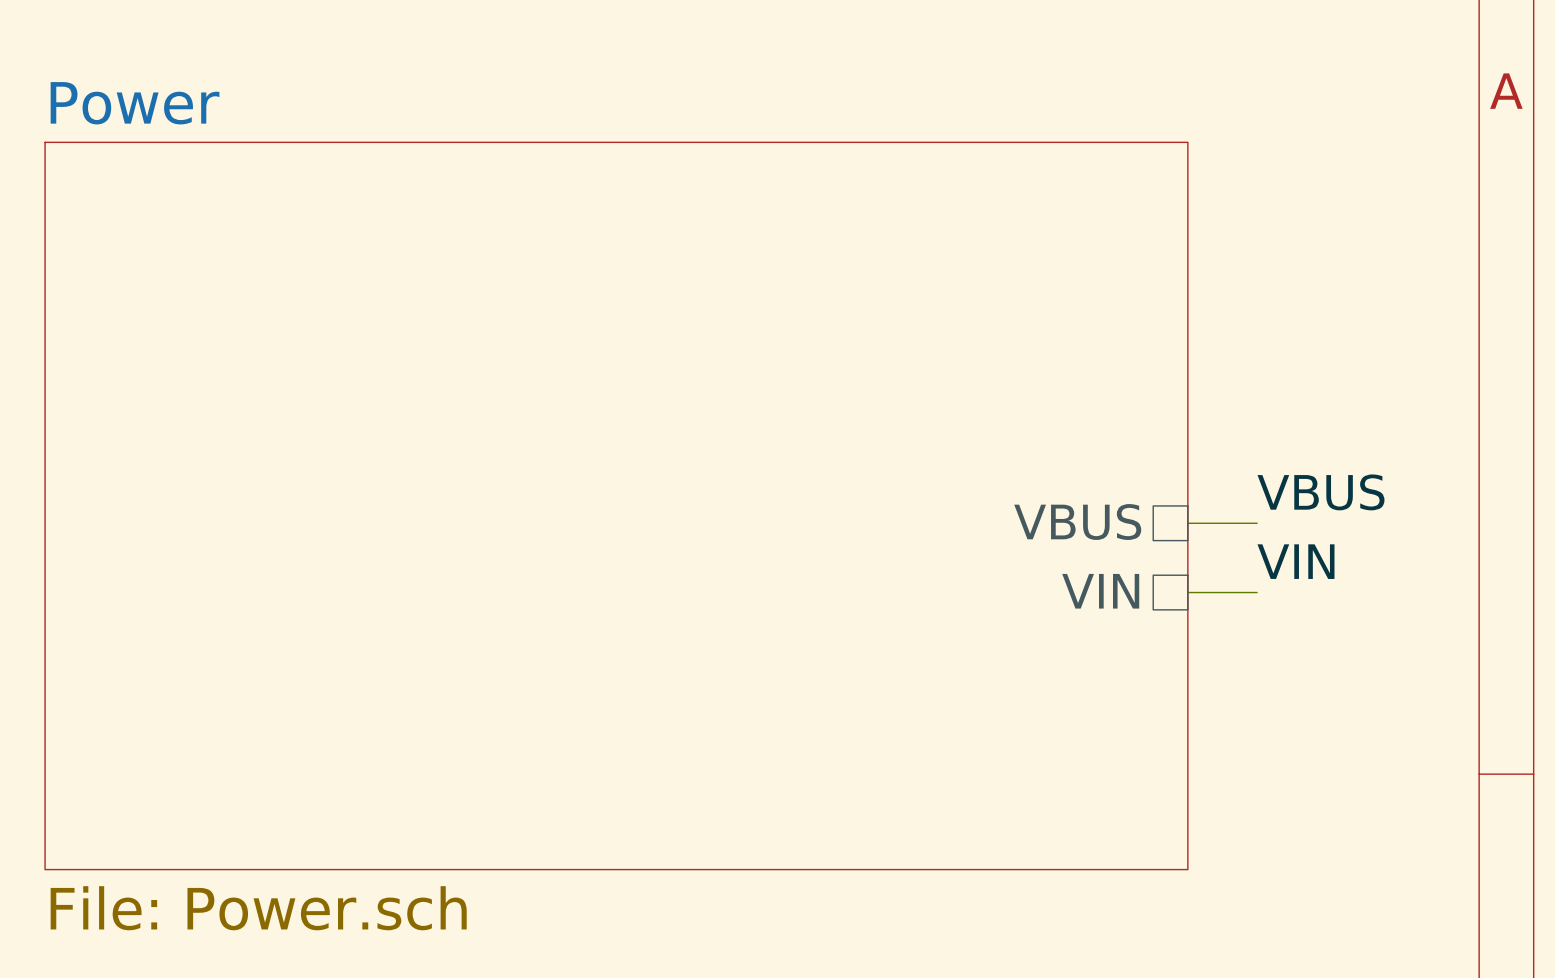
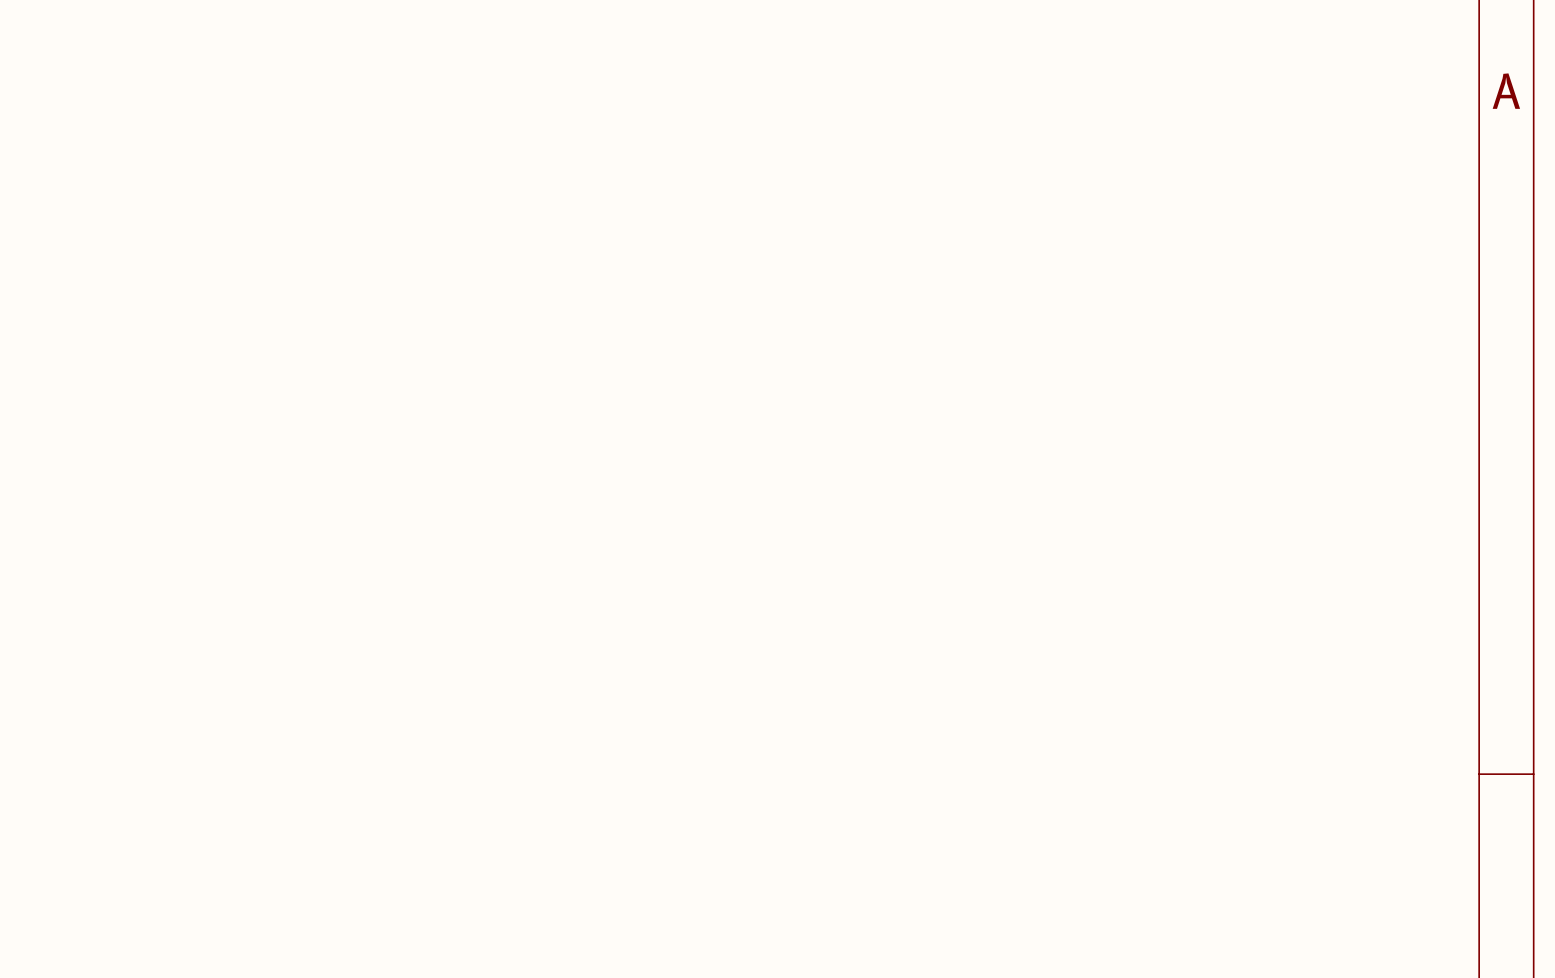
label: VBUS (1320, 492) -> none
sheet Power: File: Power.sch (616, 505) -> none
sheet pin: VBUS (1077, 522) -> none
wire: (1187, 523) (1257, 523) -> none
label: VIN (1295, 561) -> none
sheet pin: VIN (1100, 591) -> none
wire: (1187, 592) (1257, 592) -> none

